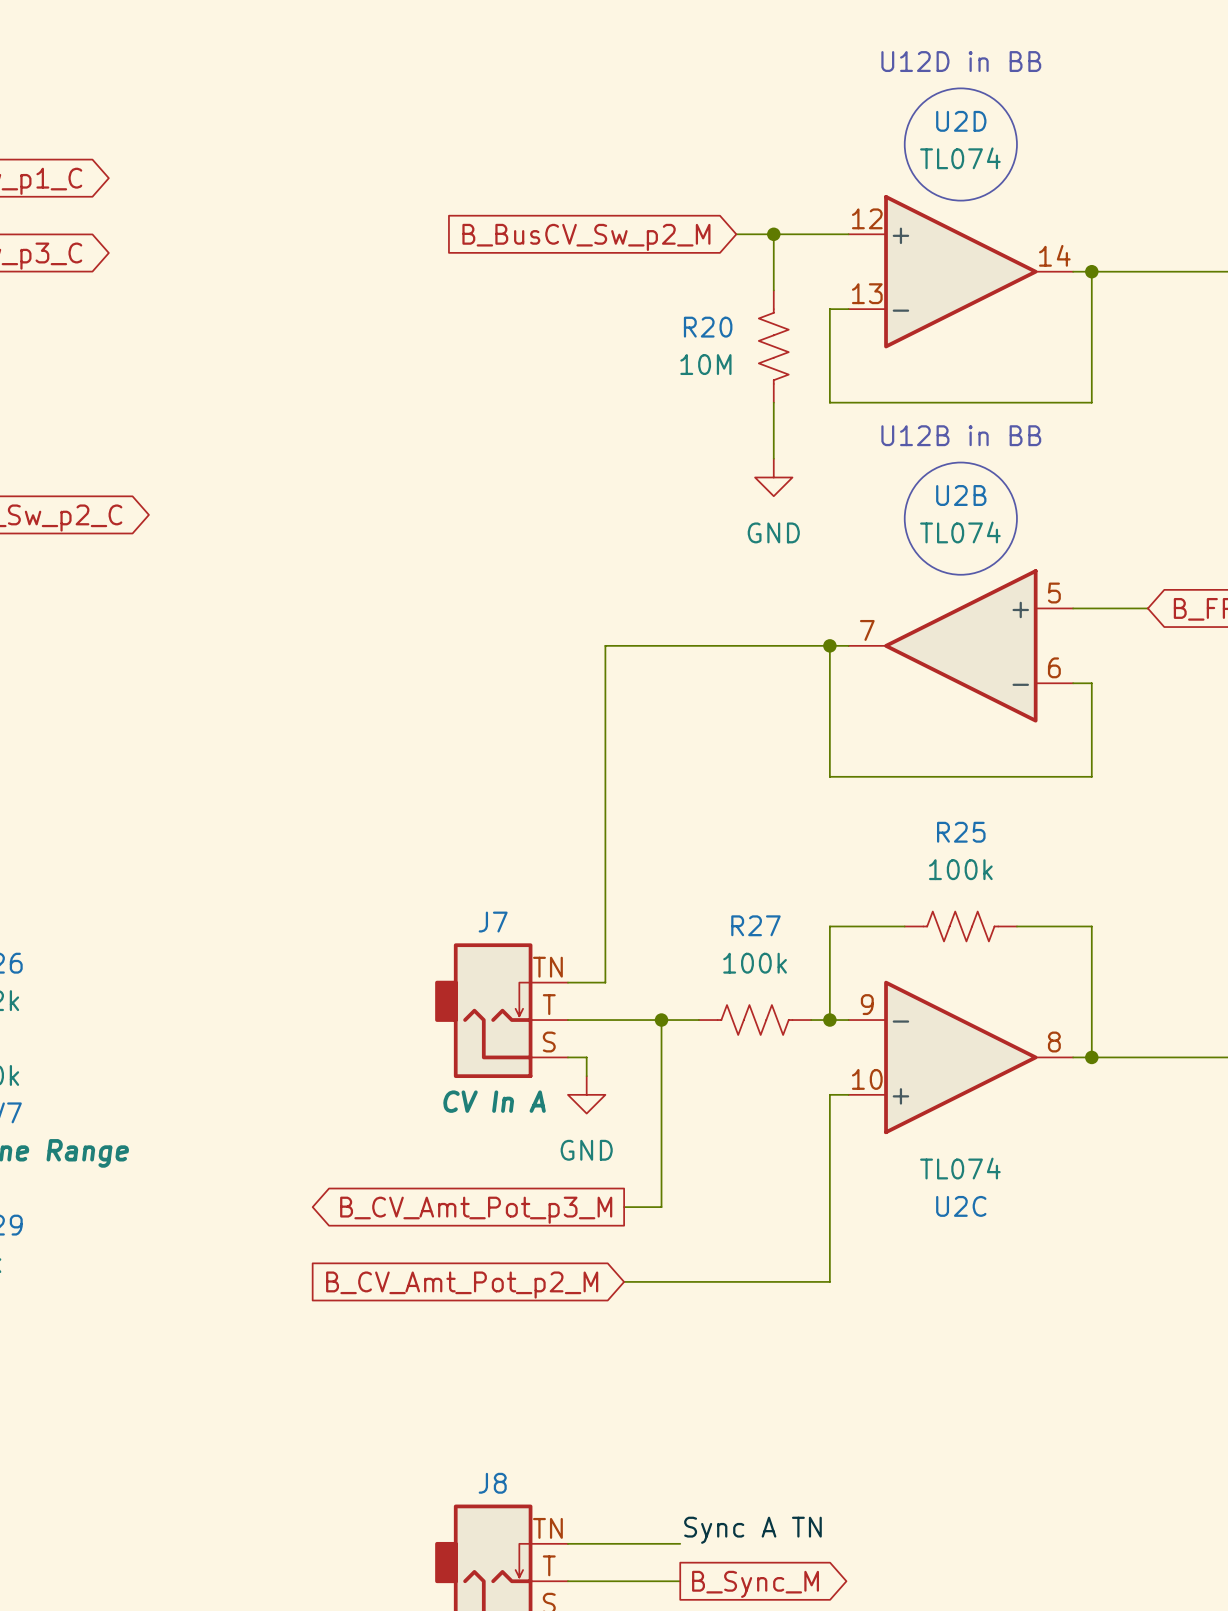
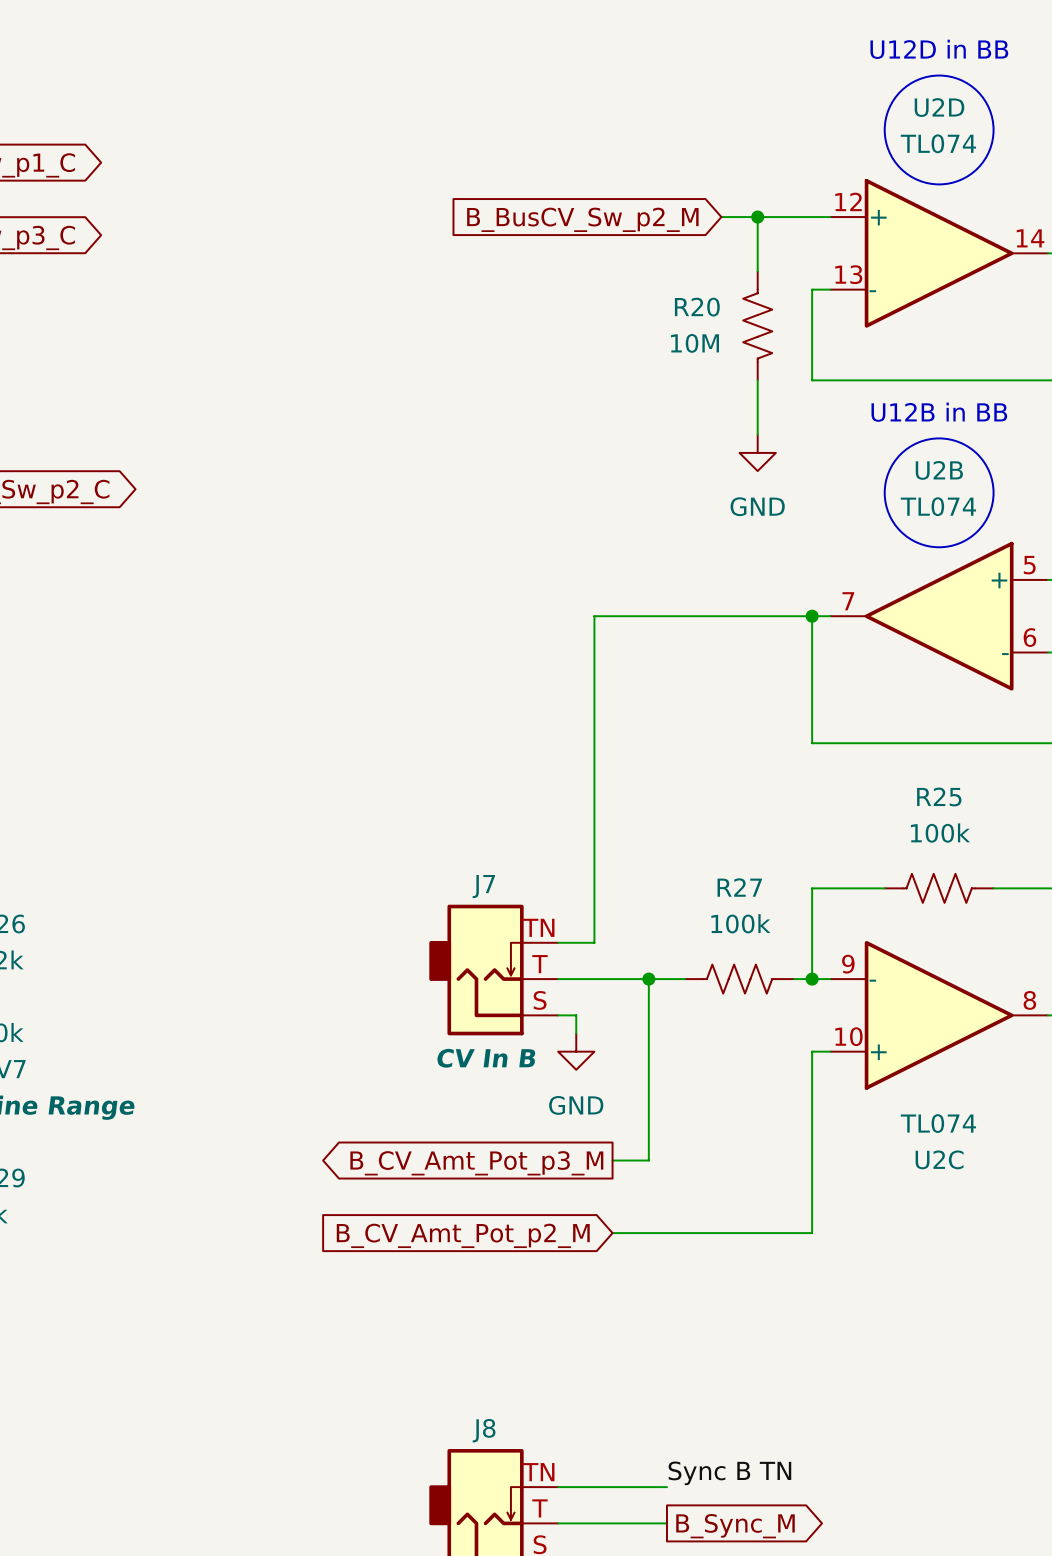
J7 text: CV In A (494, 1101) -> CV In B (486, 1058)
label: Sync A TN (752, 1530) -> Sync B TN (729, 1473)

